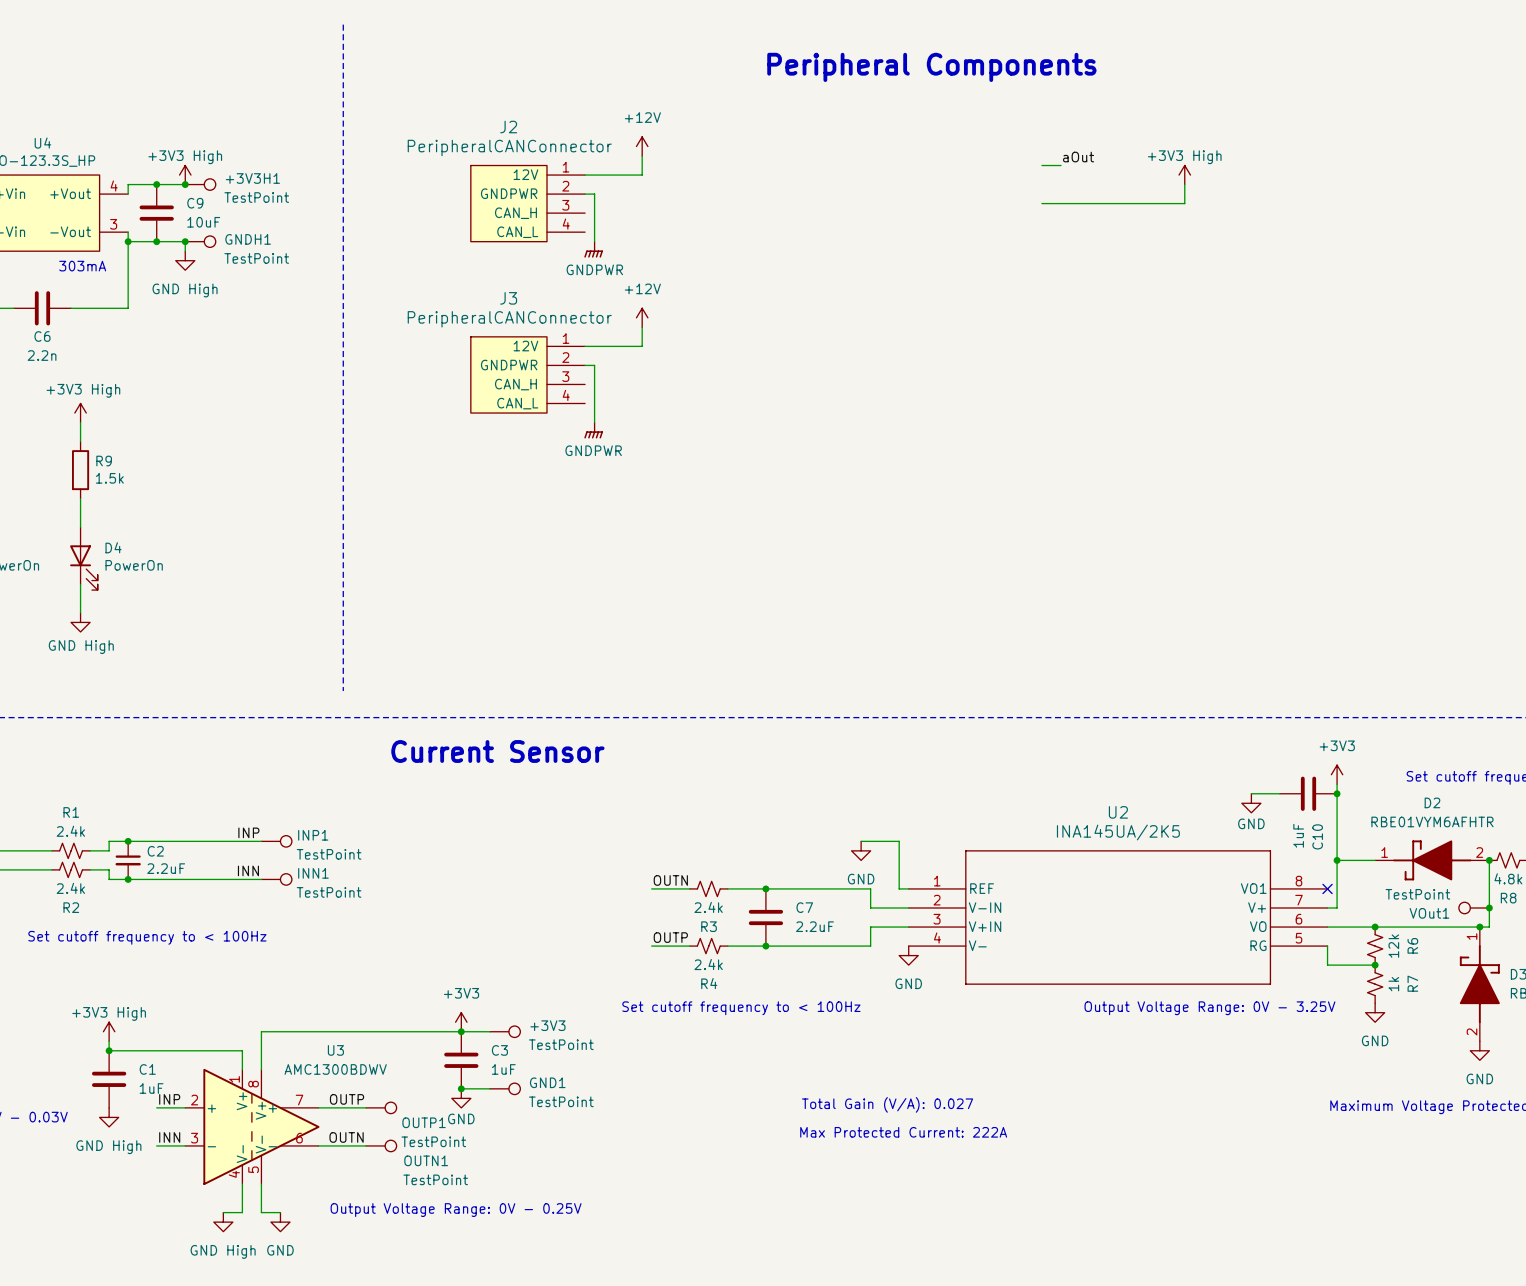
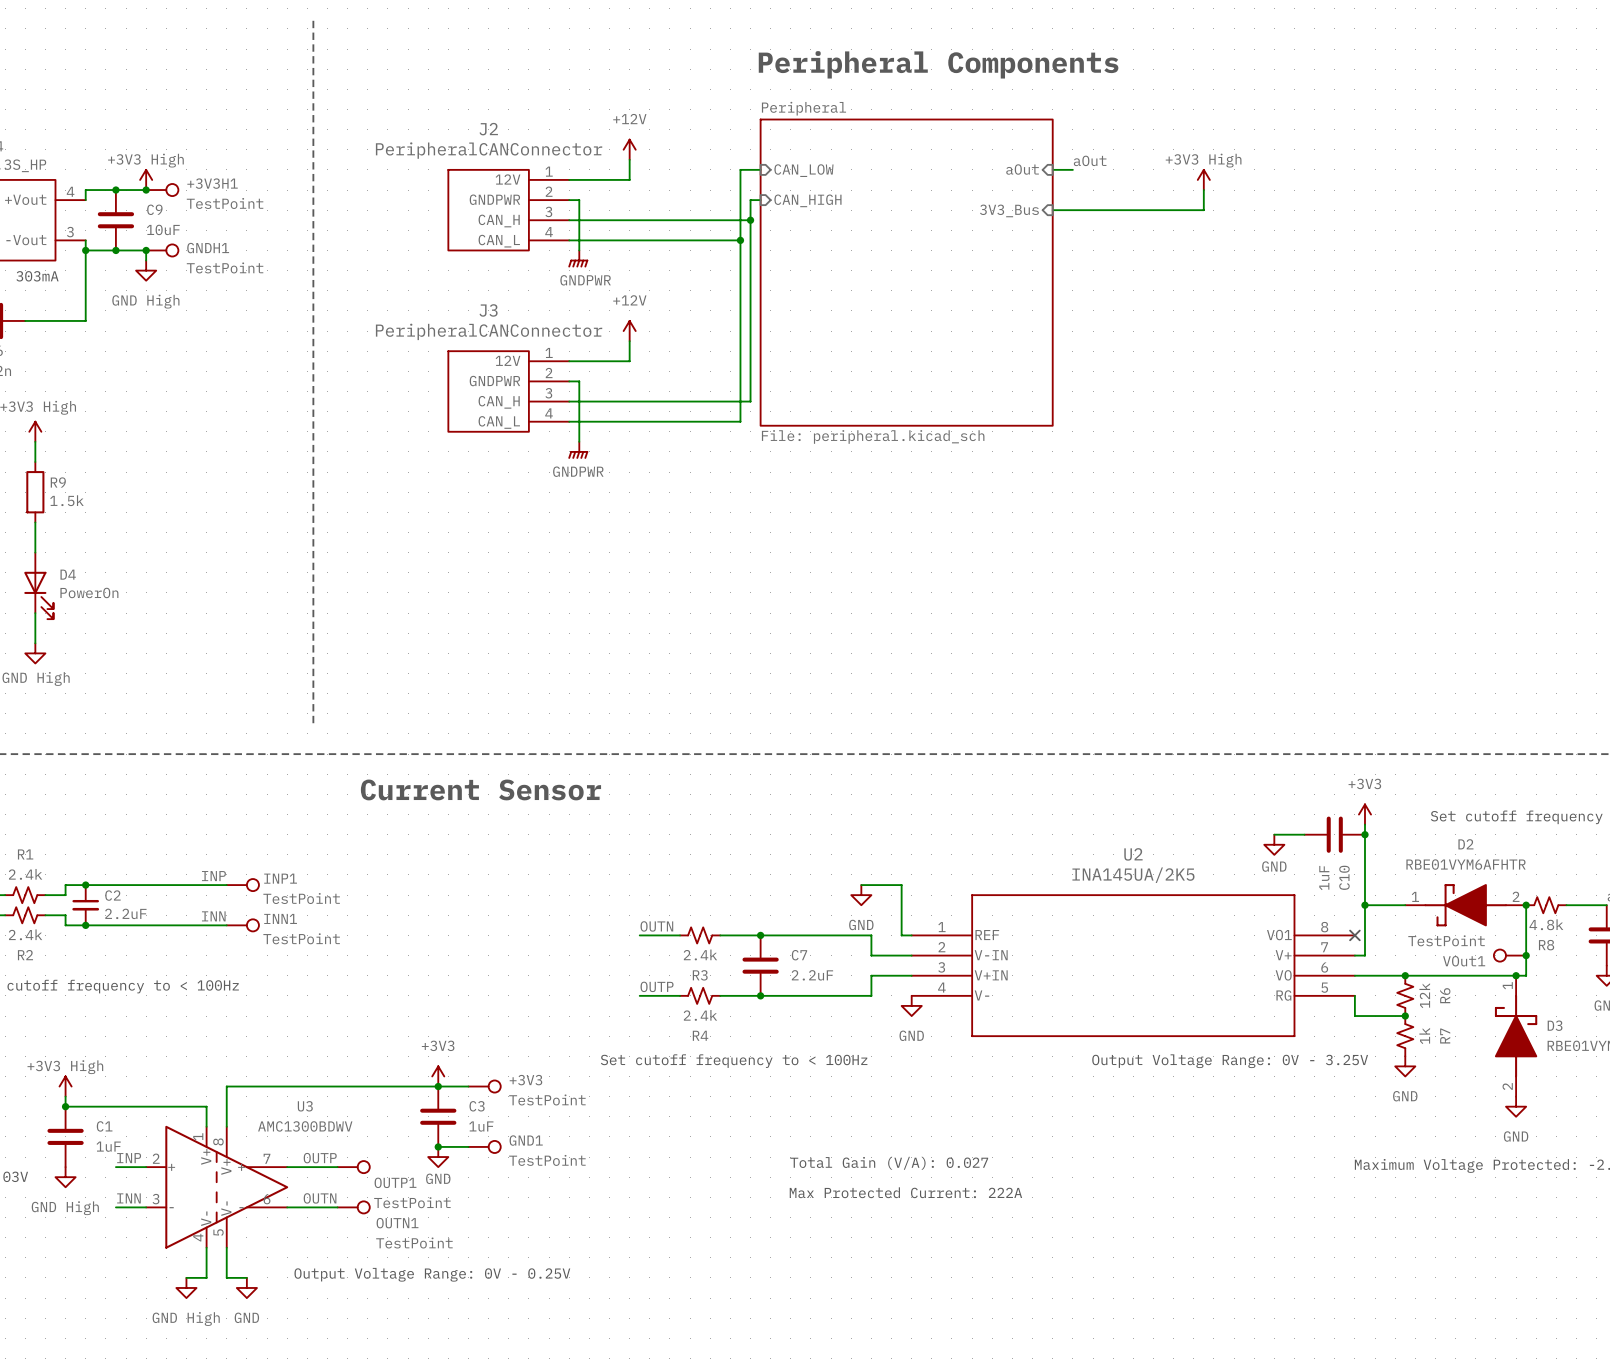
wire: none -> (760, 169) (740, 169) (740, 421) (569, 421)
sheet pin: none -> CAN_LOW (803, 170)
sheet pin: none -> aOut (1022, 169)
wire: none -> (760, 200) (750, 200) (750, 401) (569, 401)
sheet pin: none -> CAN_HIGH (807, 200)
sheet pin: none -> 3V3_Bus (1009, 210)
wire: none -> (569, 220) (750, 220)
junction: none -> (750, 220)
wire: none -> (569, 240) (740, 240)
junction: none -> (740, 240)
sheet Peripheral: none -> File: peripheral.kicad_sch (906, 272)

